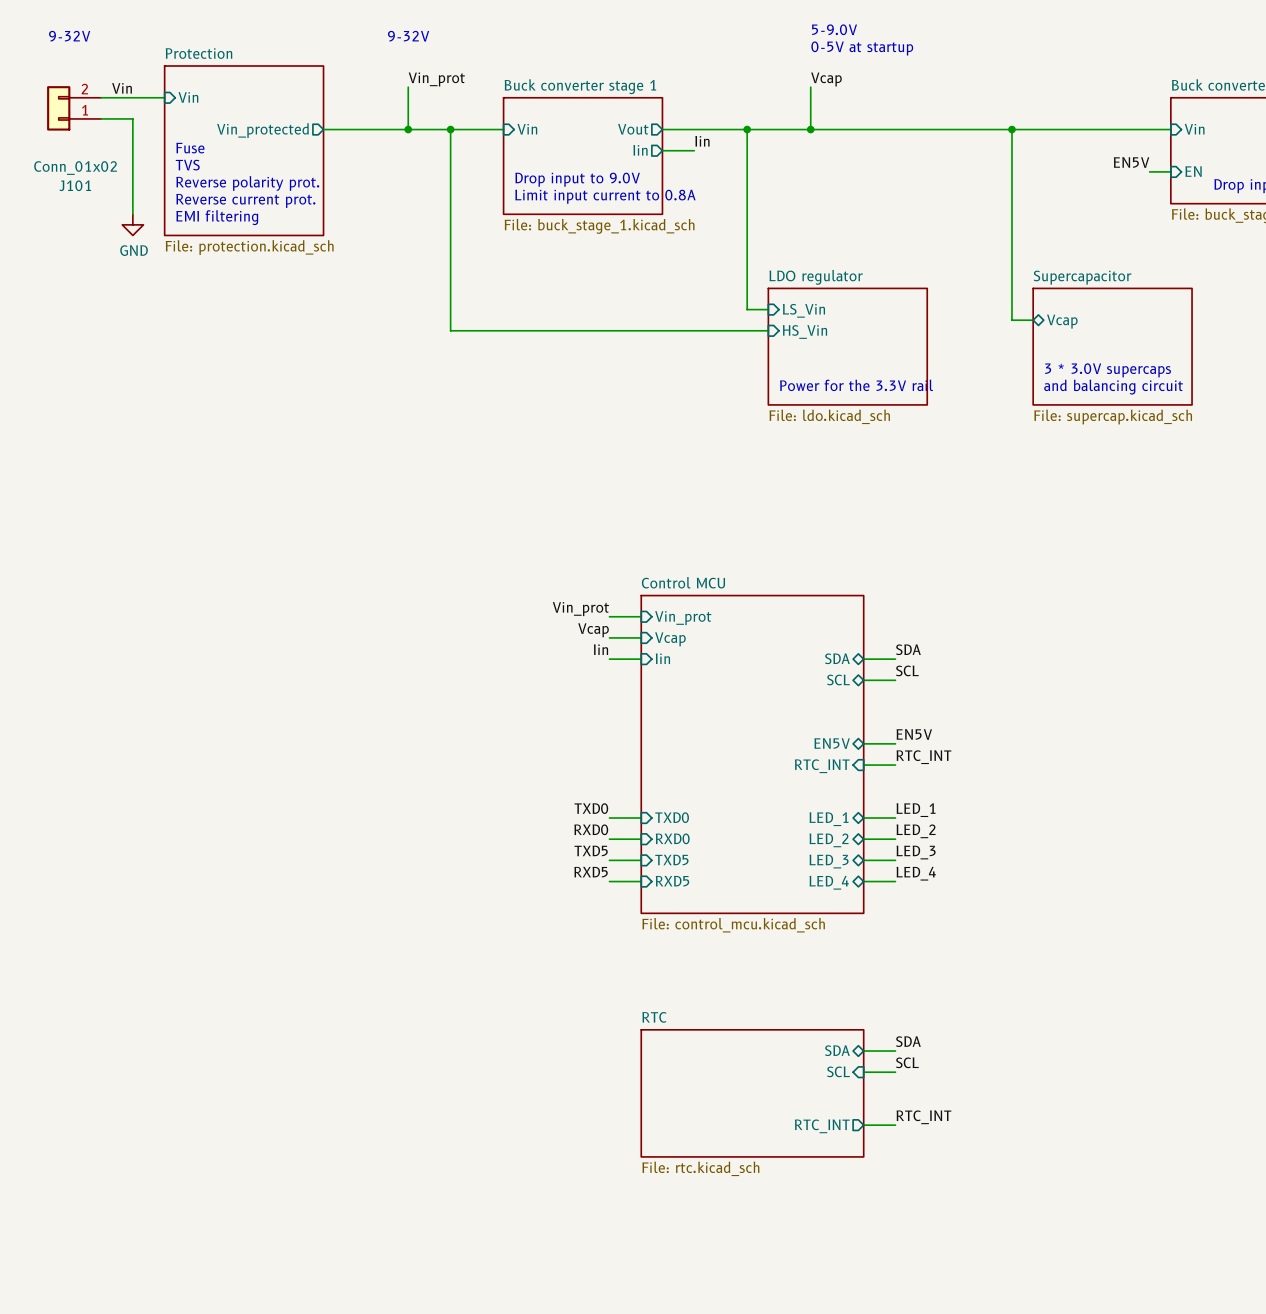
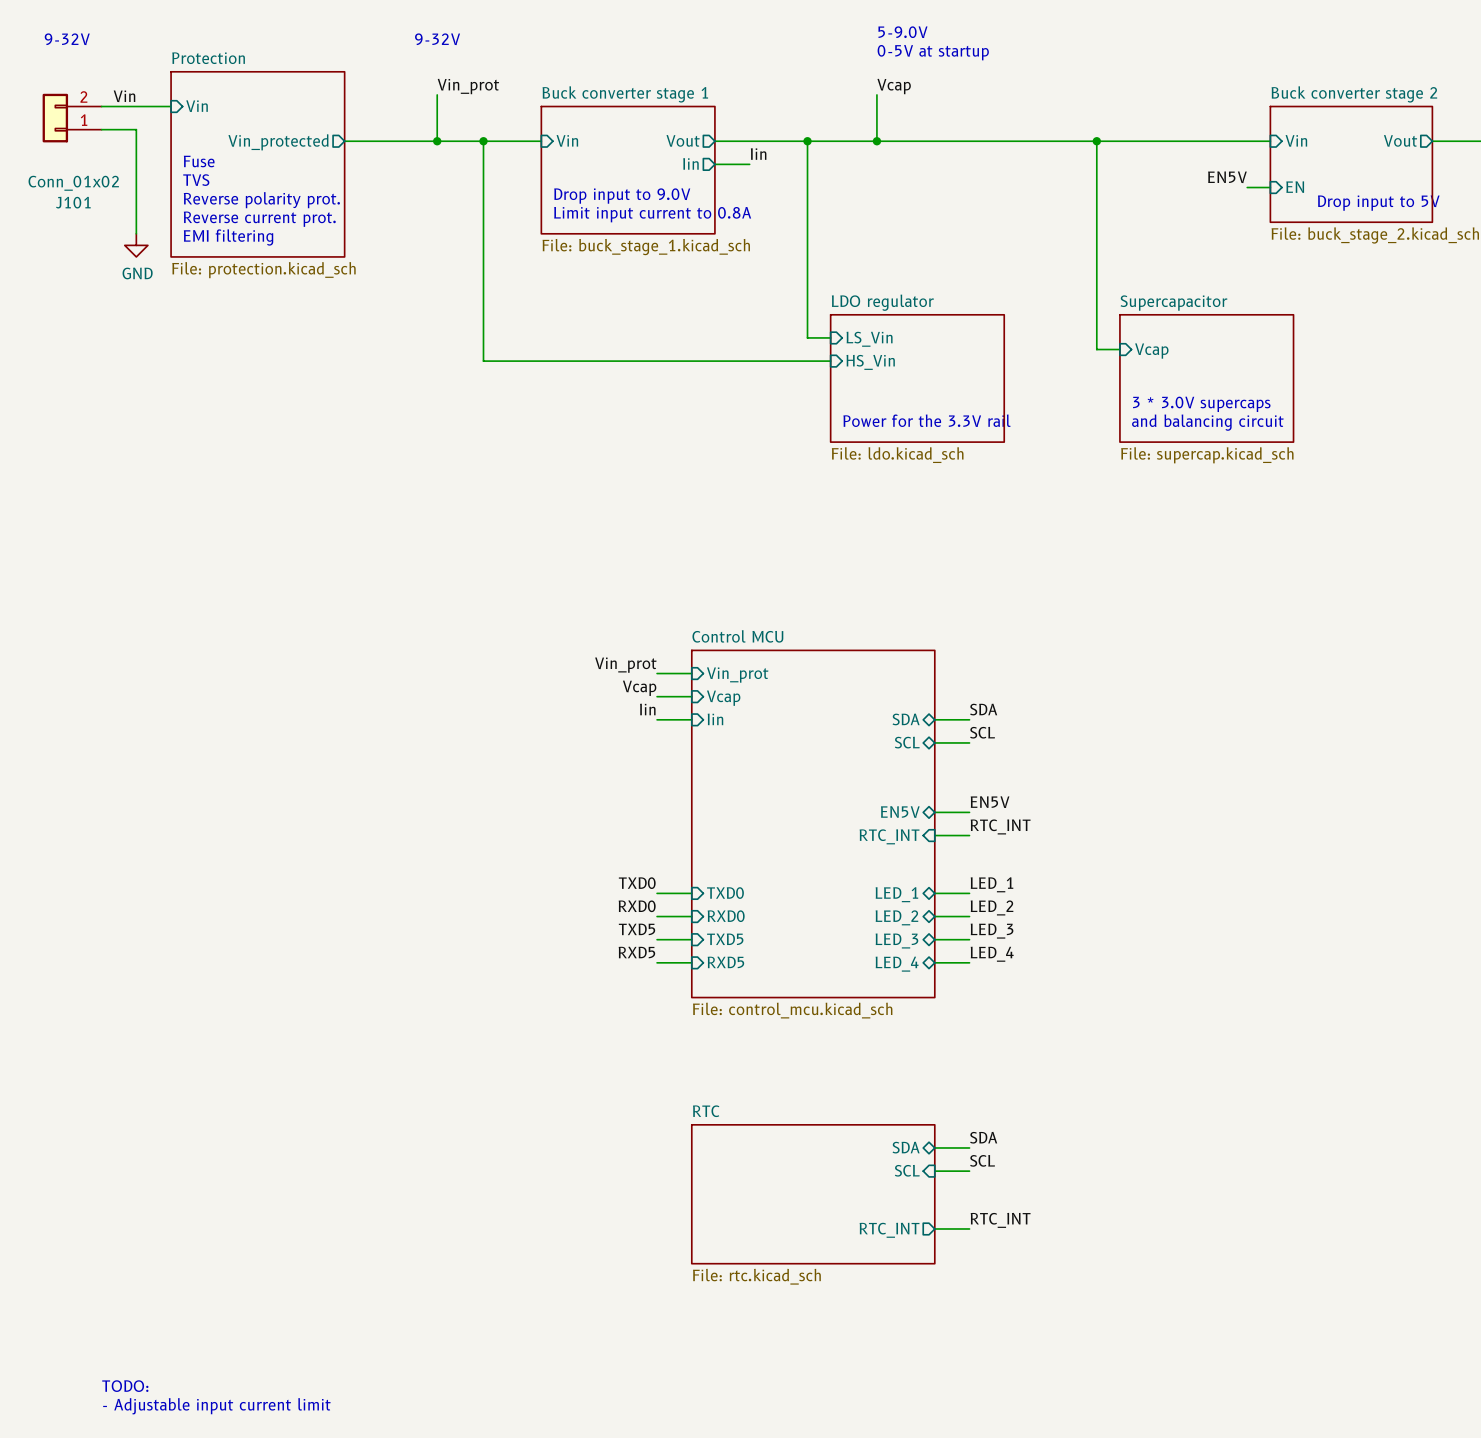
sheet pin shape: bidirectional (1062, 321) -> input (1151, 351)
text: none -> TODO: (125, 1386)
text: none -> - Adjustable input current limit (216, 1406)

